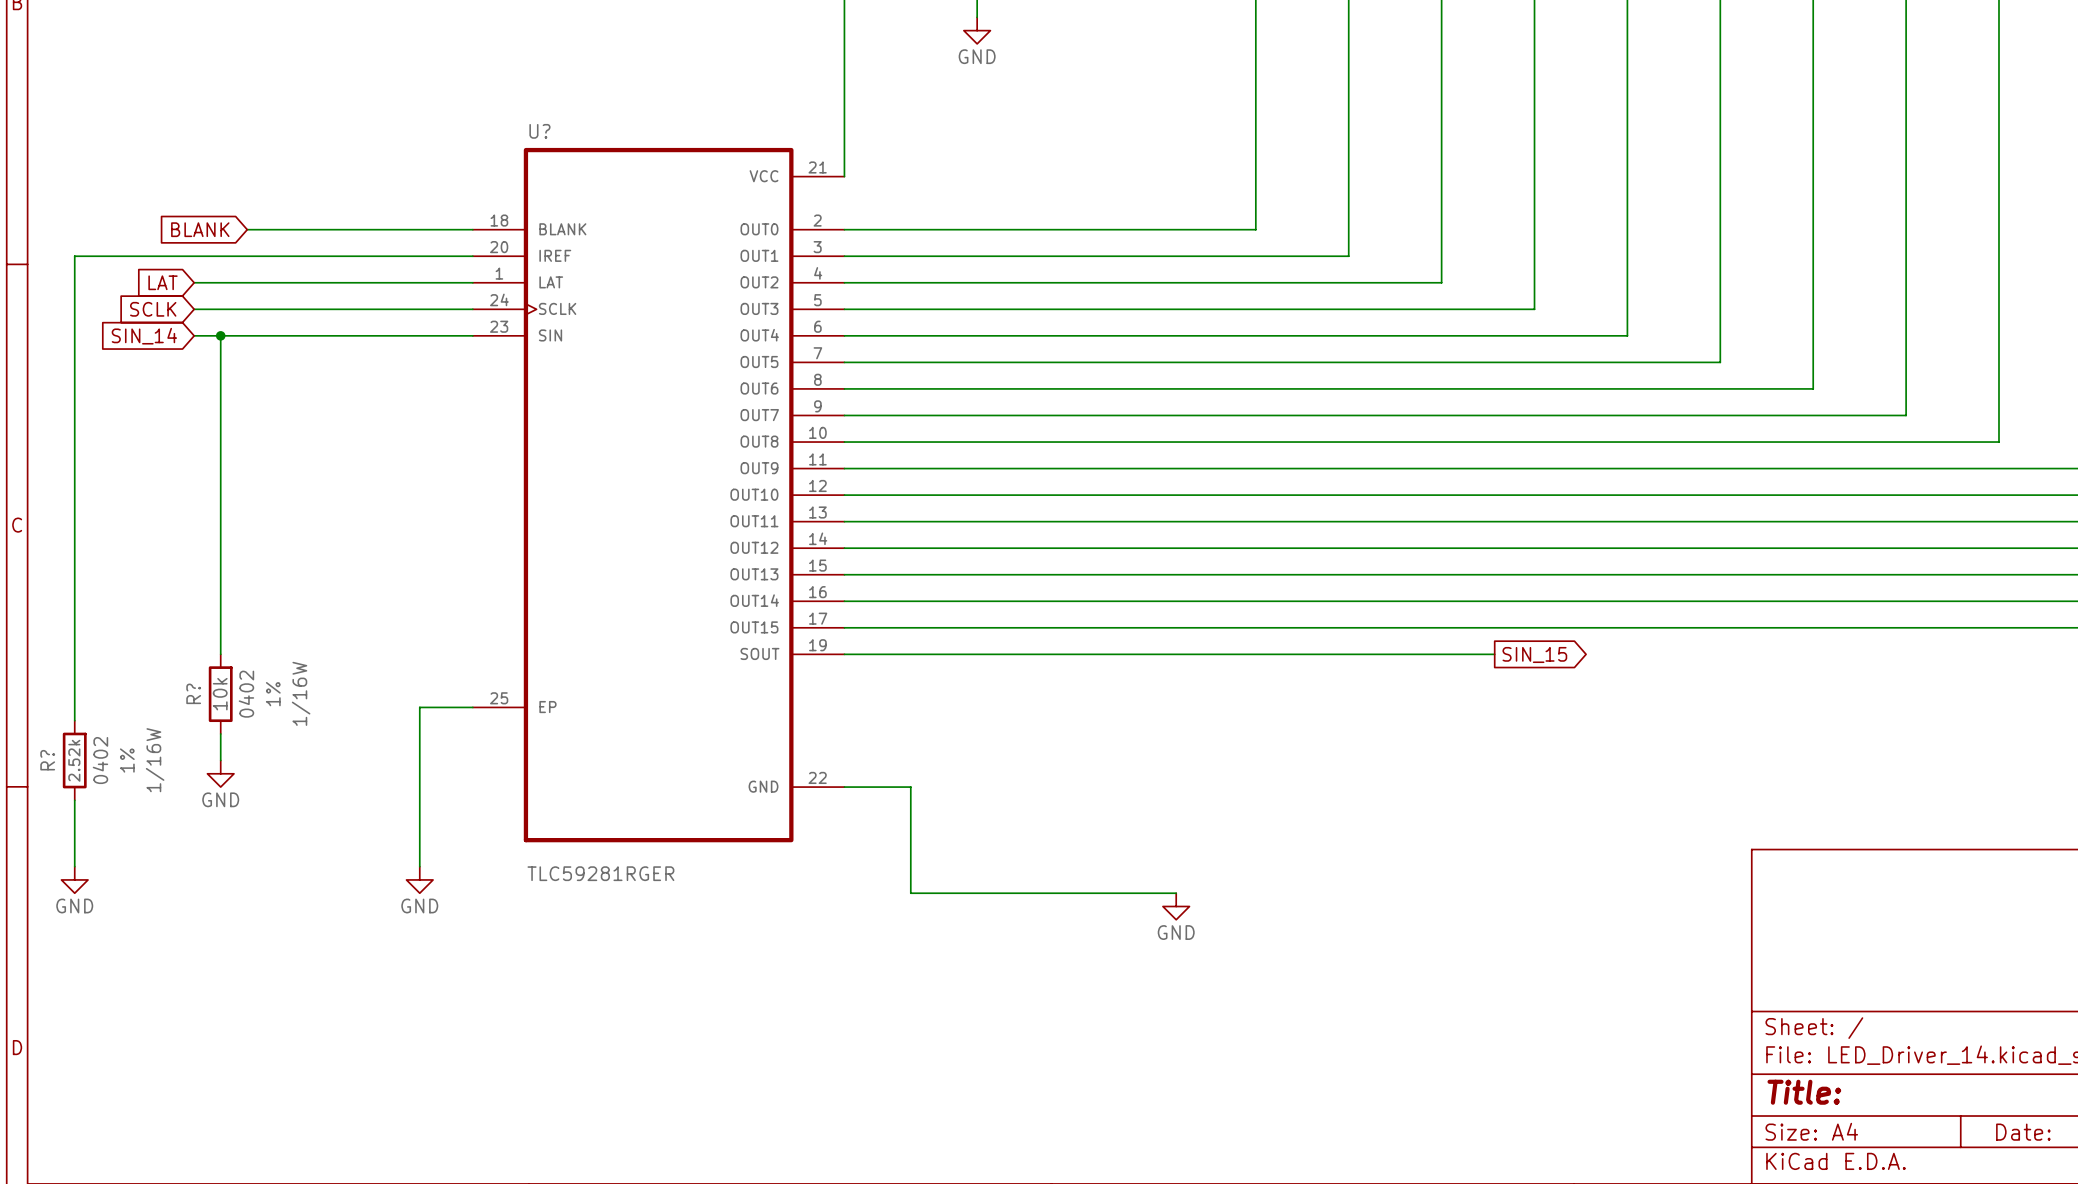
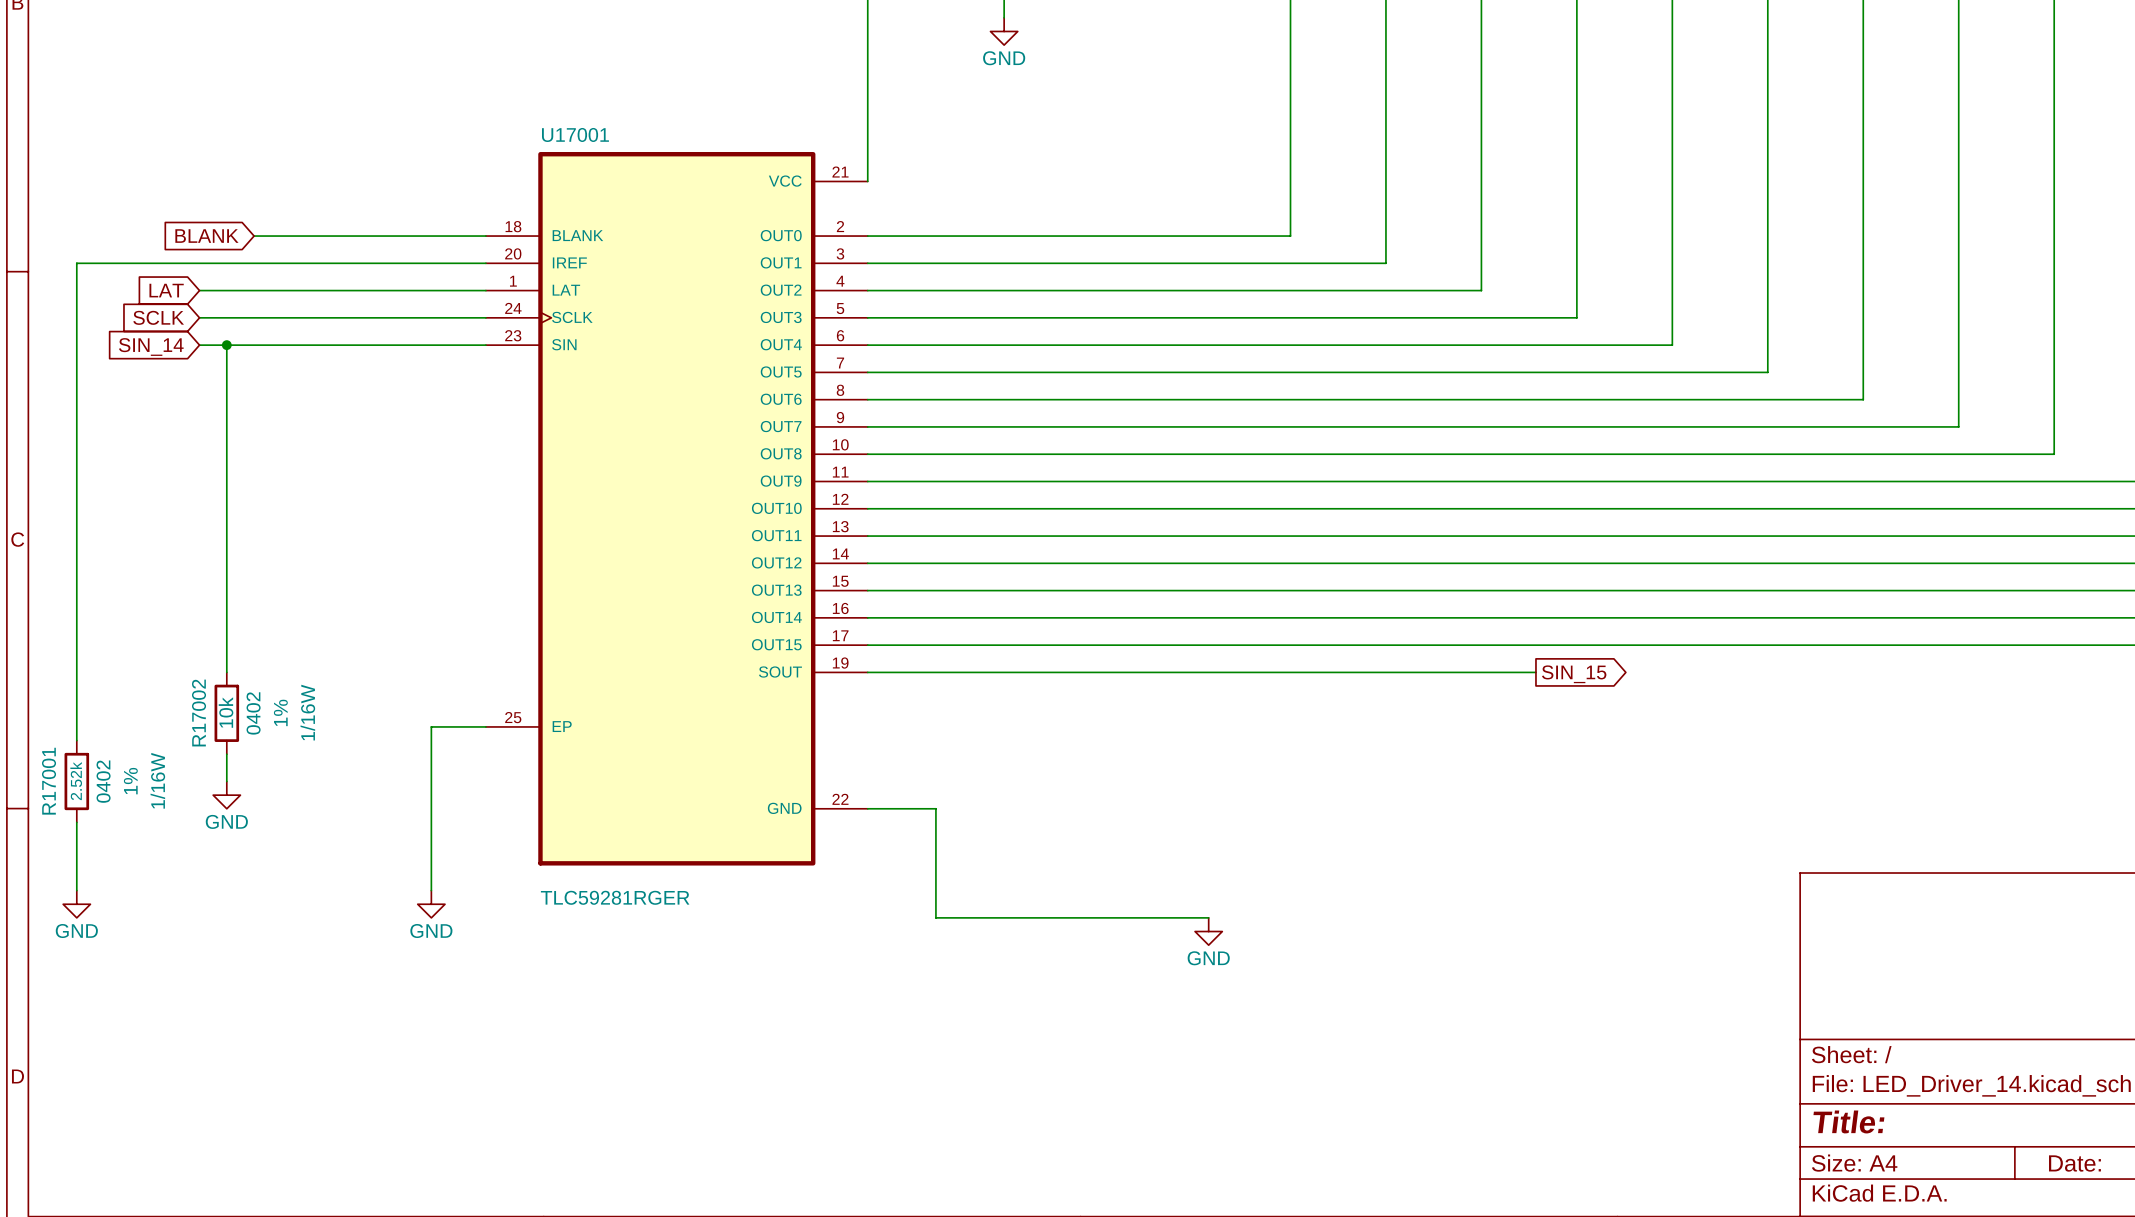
U? name: U? (539, 131) -> U17001 (575, 134)
R? name: R? (193, 693) -> R17002 (199, 713)
R? name: R? (47, 760) -> R17001 (49, 781)

